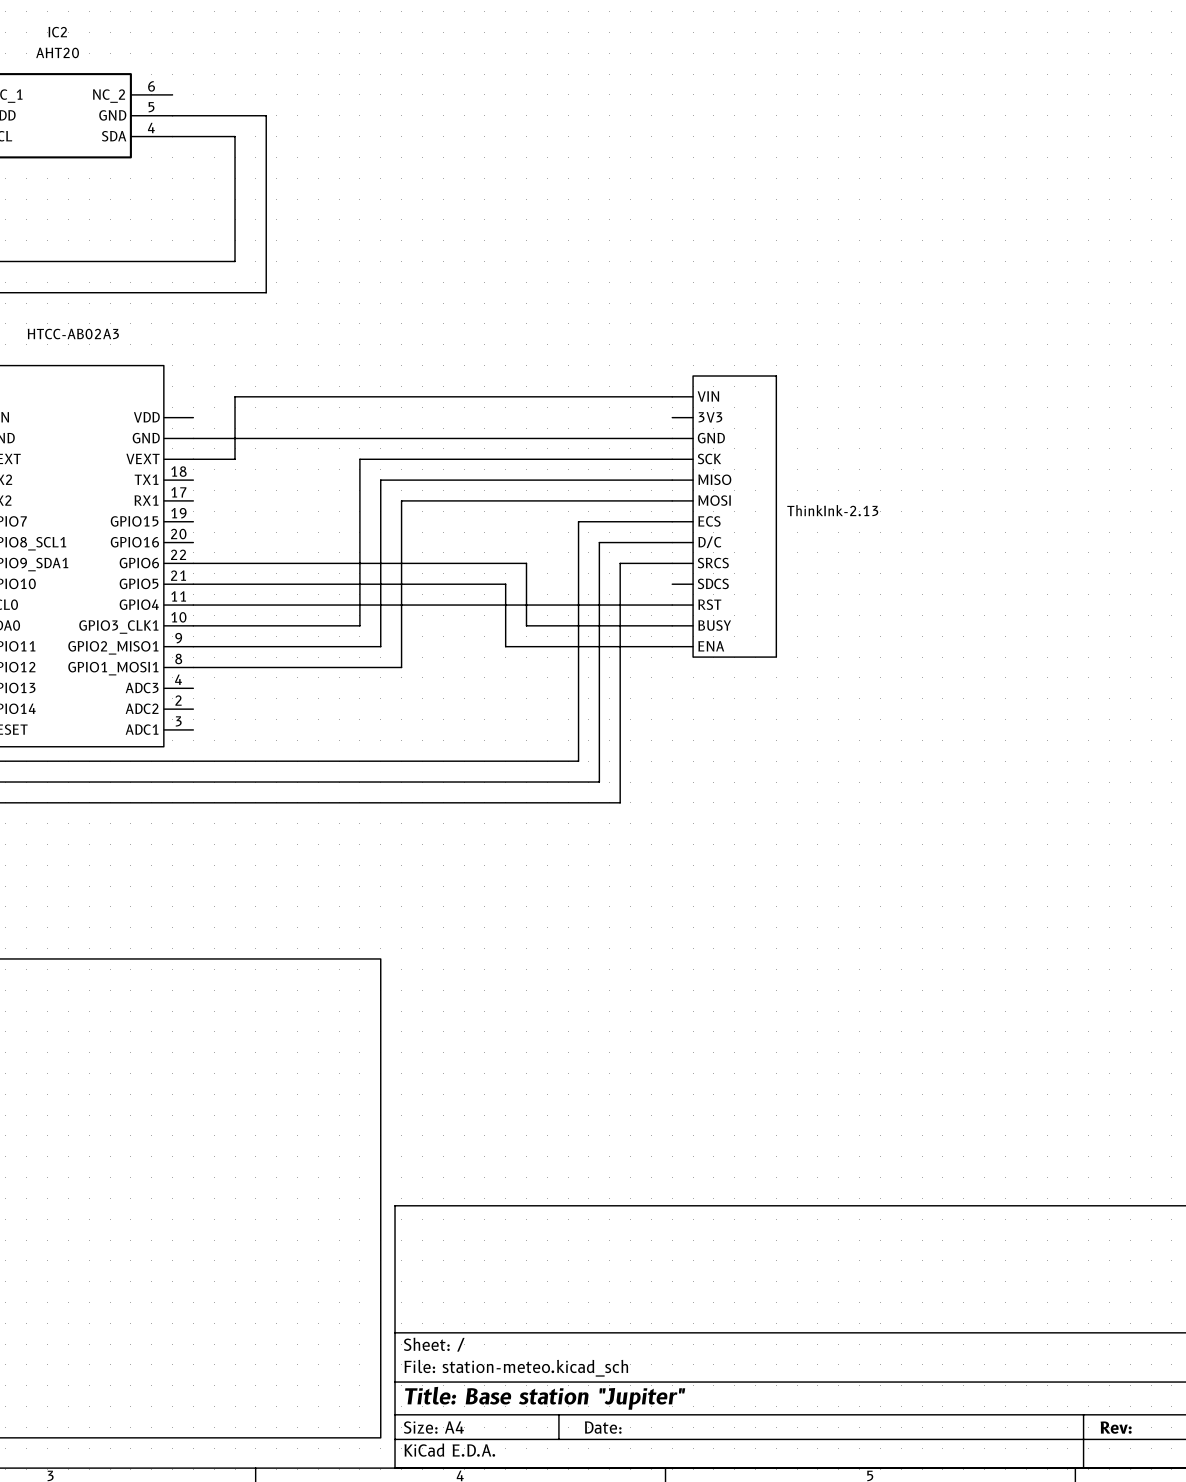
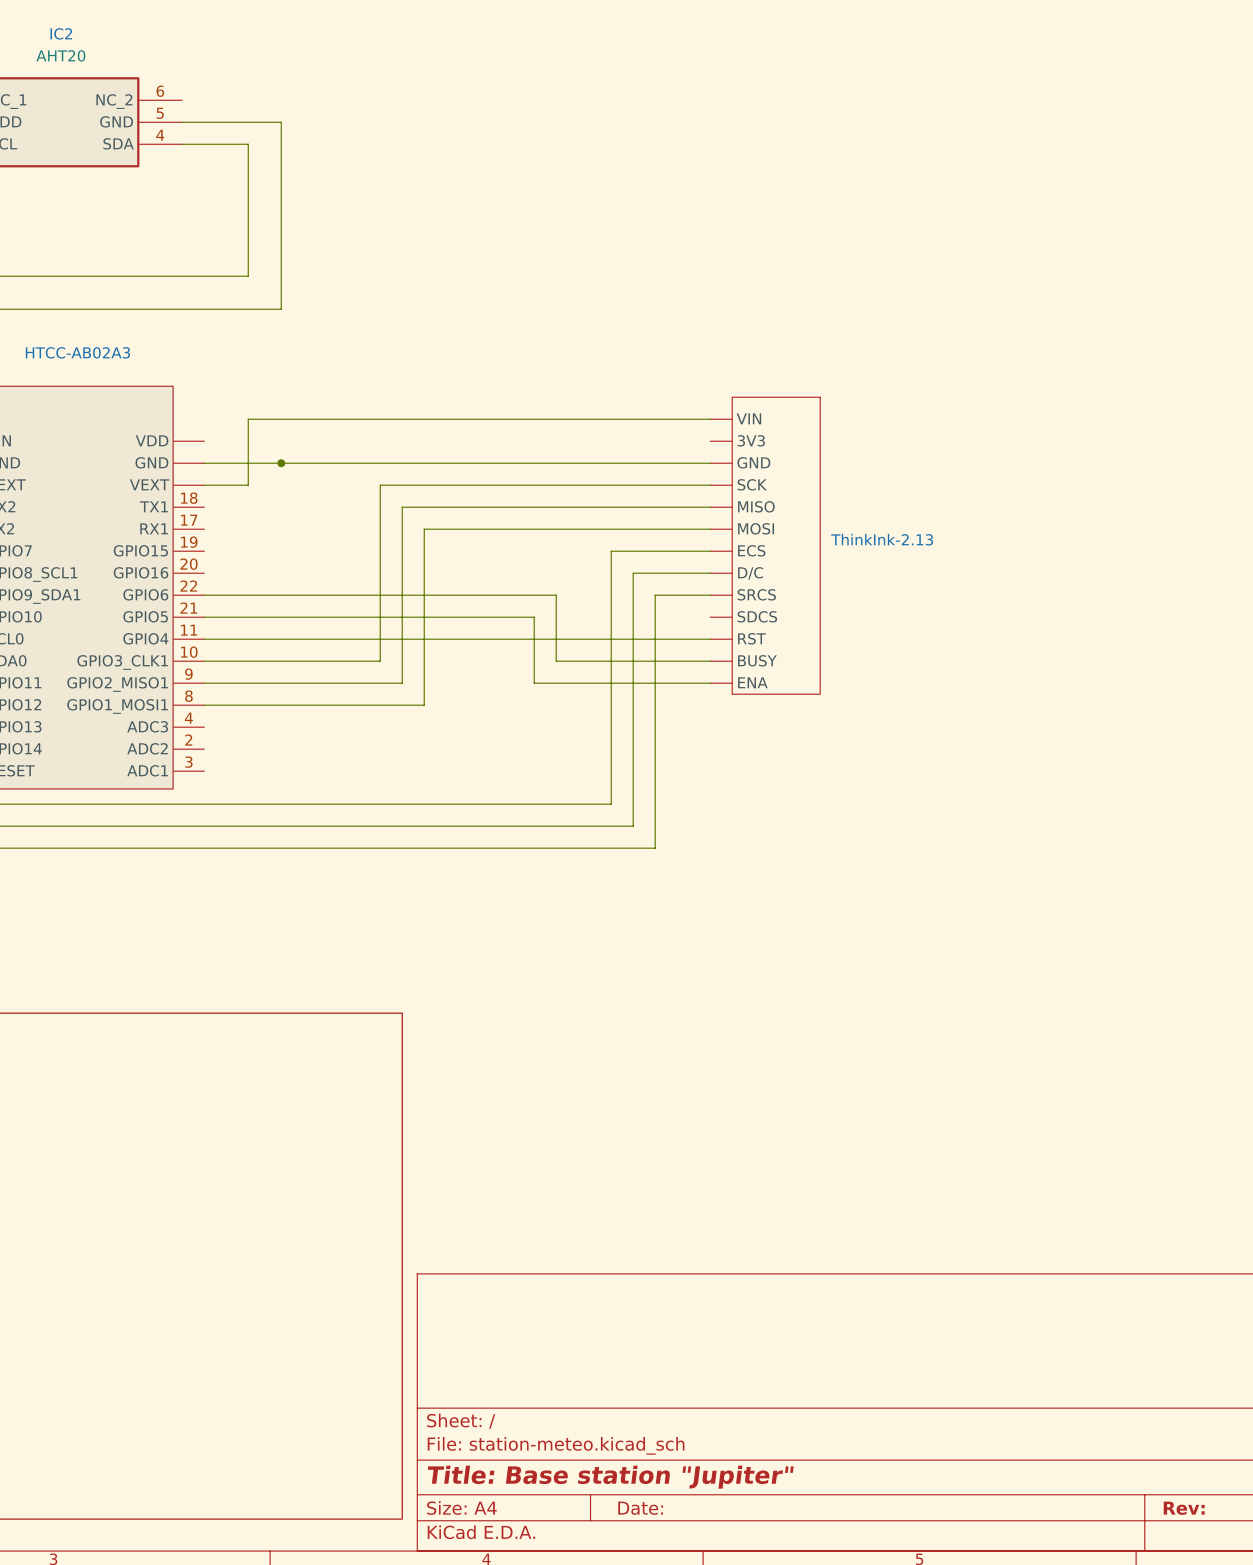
junction: none -> (281, 463)

